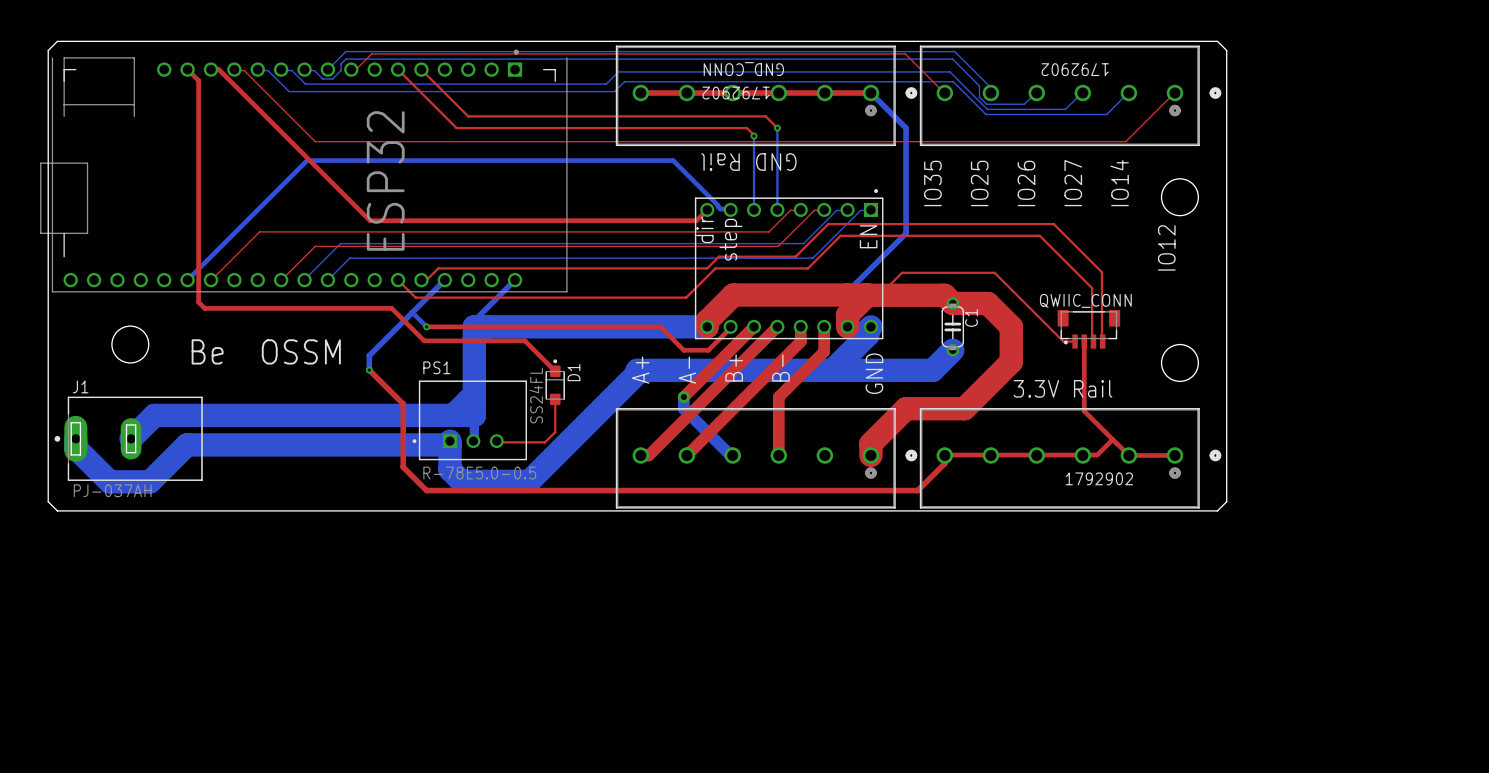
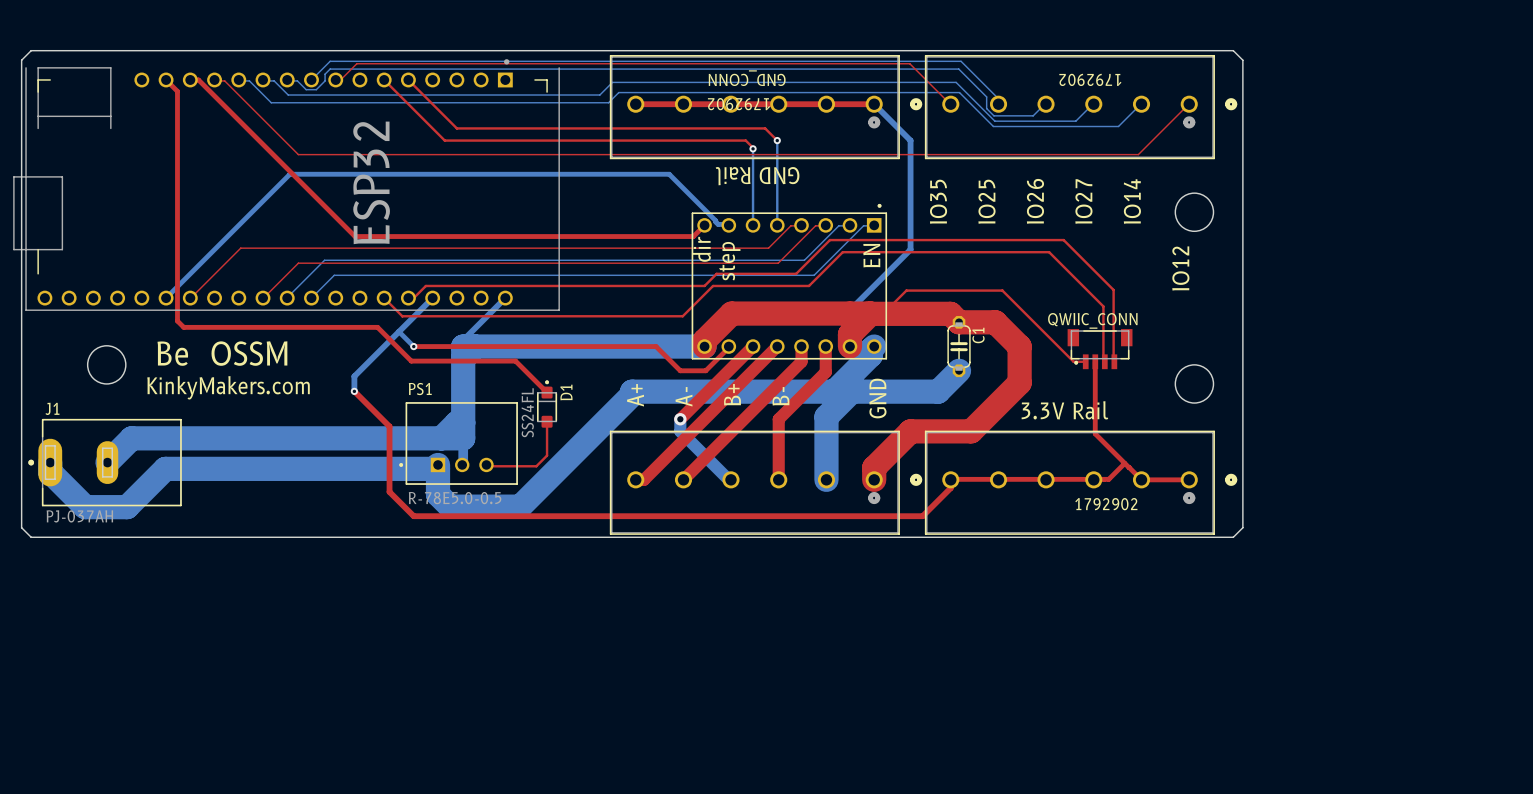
text position: Be OSSM (266, 351) -> Be OSSM (222, 353)
text: none -> KinkyMakers.com (228, 387)
bottom track: none -> (851, 391) (826, 416) (826, 479)

